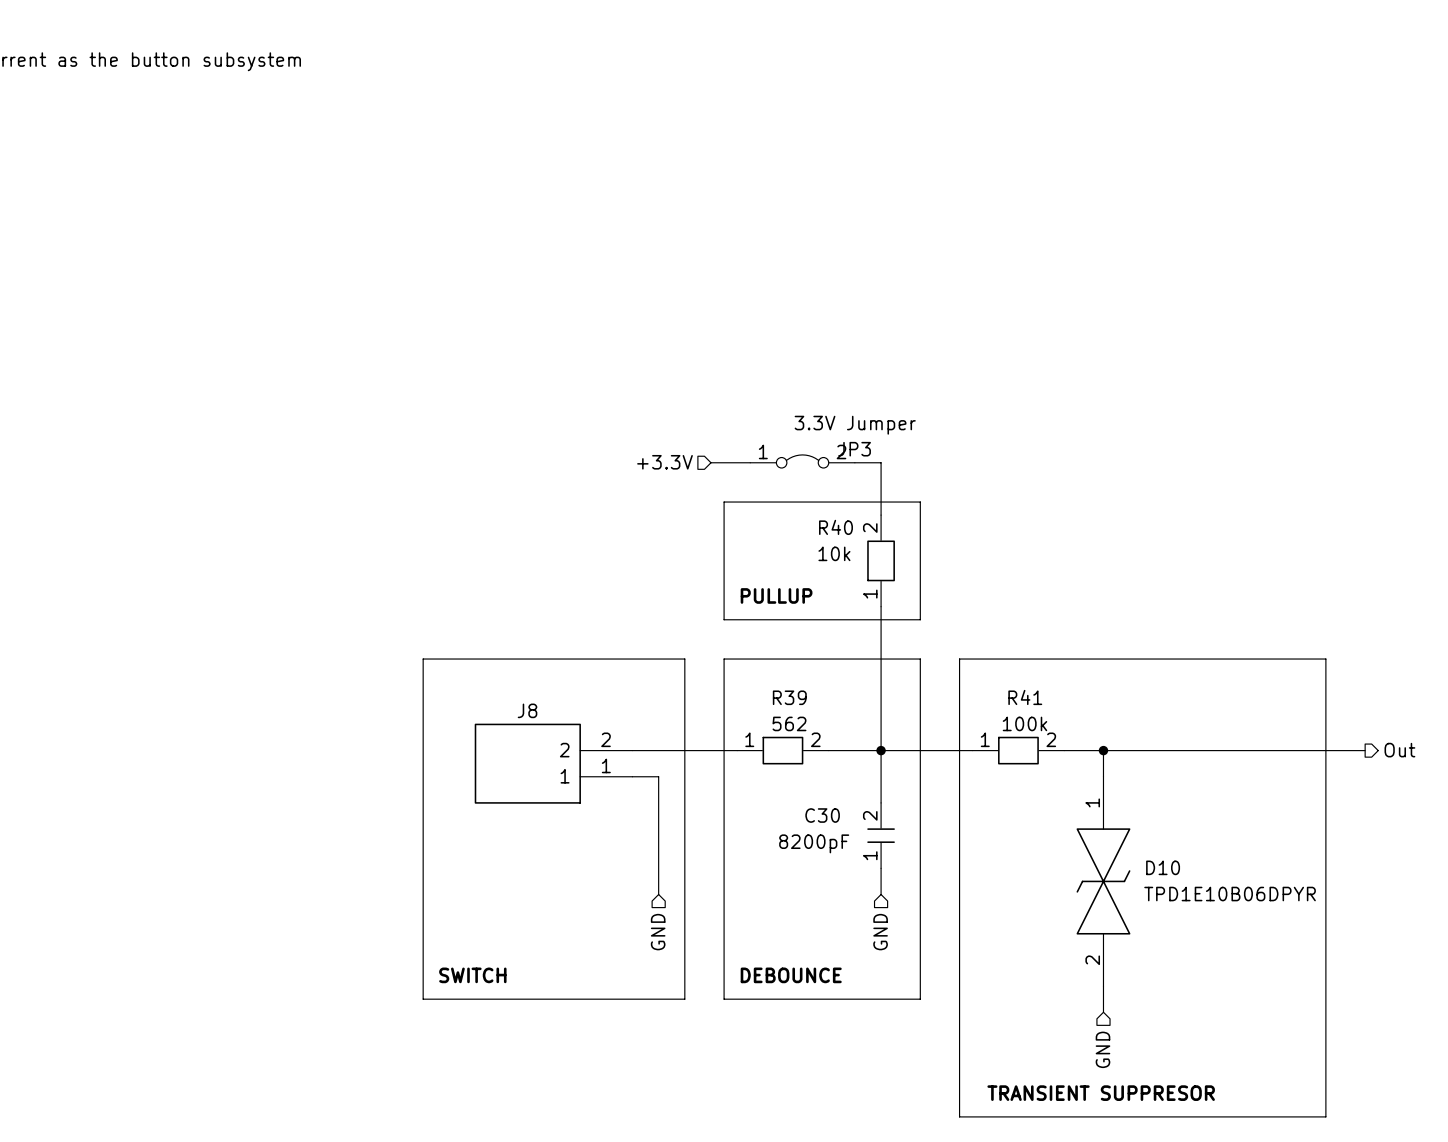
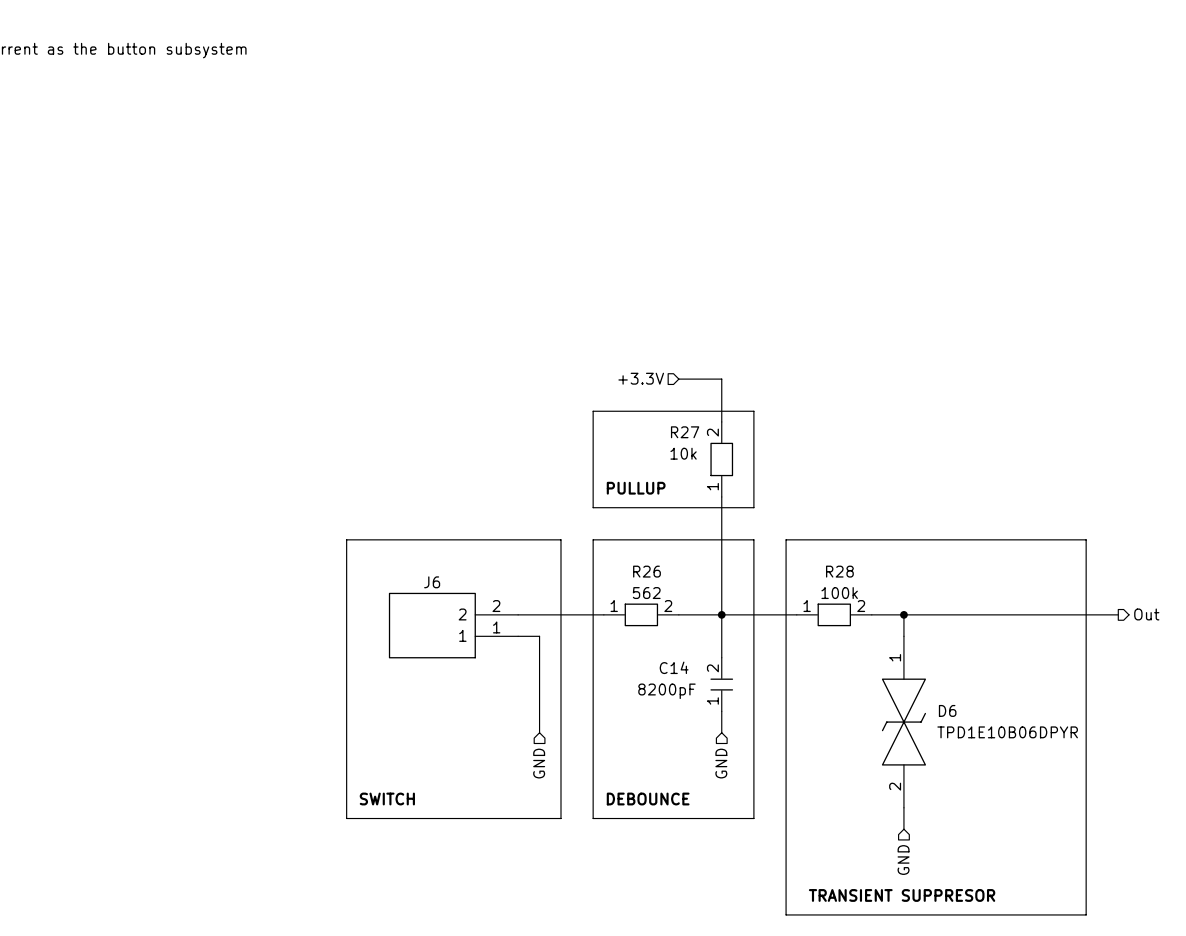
JP3: 3.3V Jumper (802, 461) -> none
hierarchical label position: +3.3V (664, 462) -> +3.3V (641, 378)
wire: (710, 462) (750, 462) -> none
R40 name: R40 (836, 527) -> R27 (685, 432)
R39 name: R39 (789, 697) -> R26 (646, 571)
R41 name: R41 (1025, 697) -> R28 (839, 571)
J8 name: J8 (527, 710) -> J6 (432, 582)
C30 name: C30 (822, 815) -> C14 (674, 667)
D10 name: D10 (1163, 867) -> D6 (947, 710)

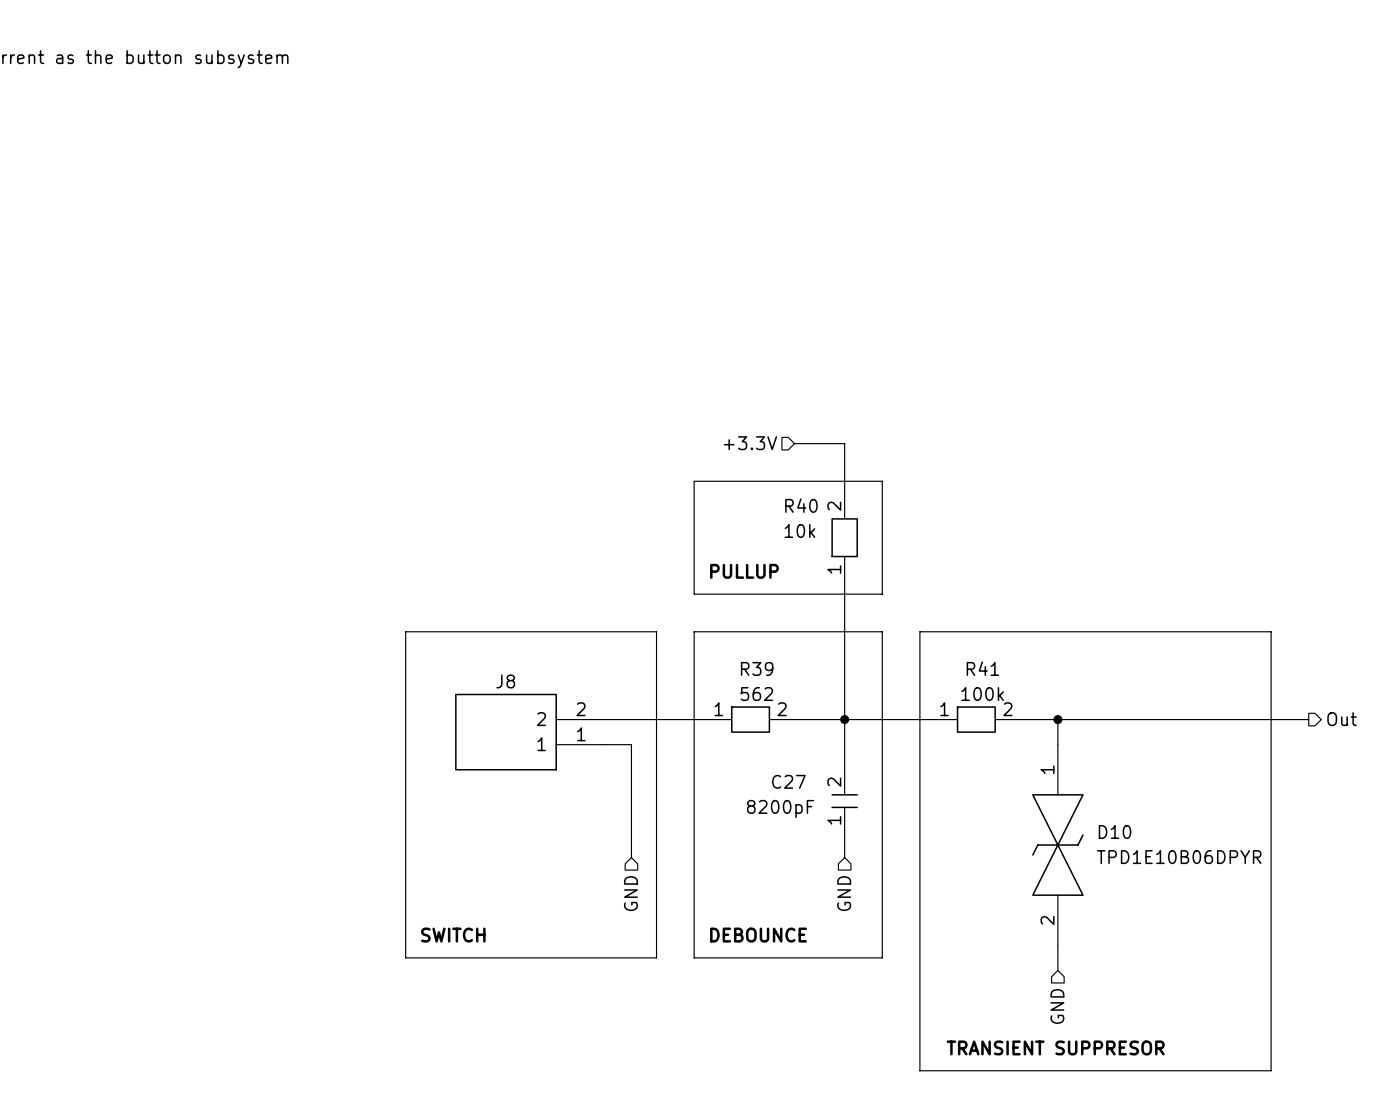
R27 name: R27 (685, 432) -> R40 (801, 505)
R26 name: R26 (646, 571) -> R39 (757, 668)
R28 name: R28 (839, 571) -> R41 (982, 668)
J6 name: J6 (432, 582) -> J8 (505, 681)
C14 name: C14 (674, 667) -> C27 (788, 781)
D6 name: D6 (947, 710) -> D10 (1115, 831)

